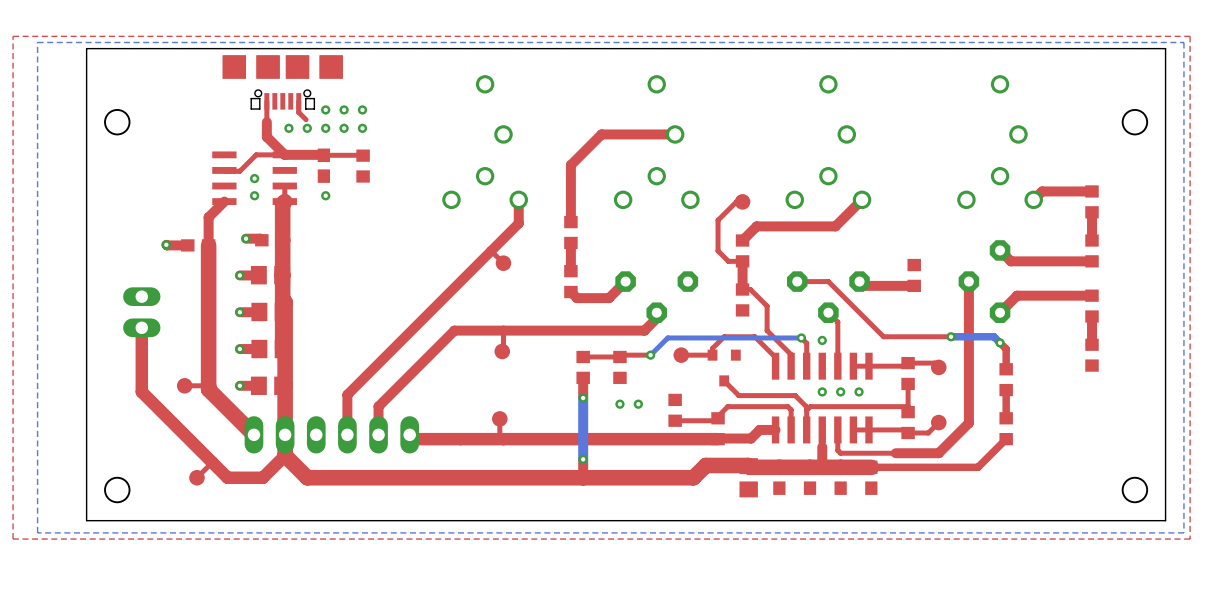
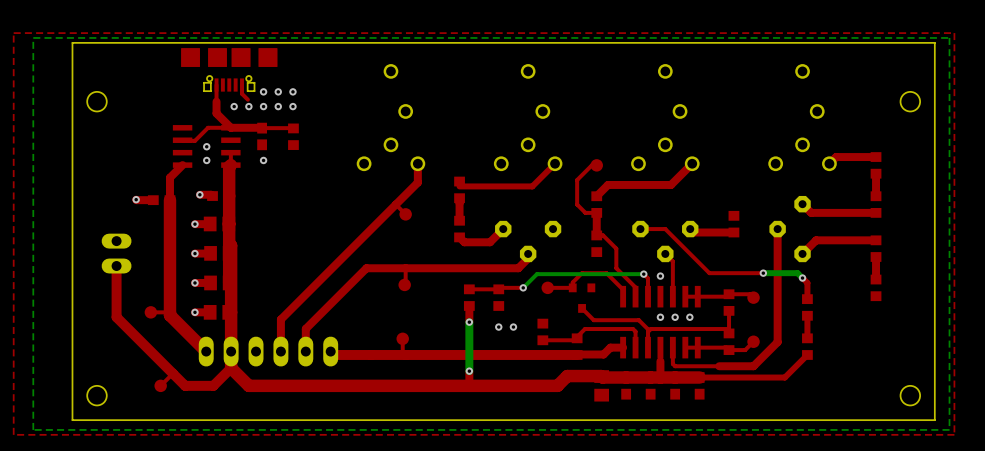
top track: (675, 134) (601, 134) (570, 165) (570, 222) -> none
top track: none -> (555, 163) (532, 186) (459, 186)

